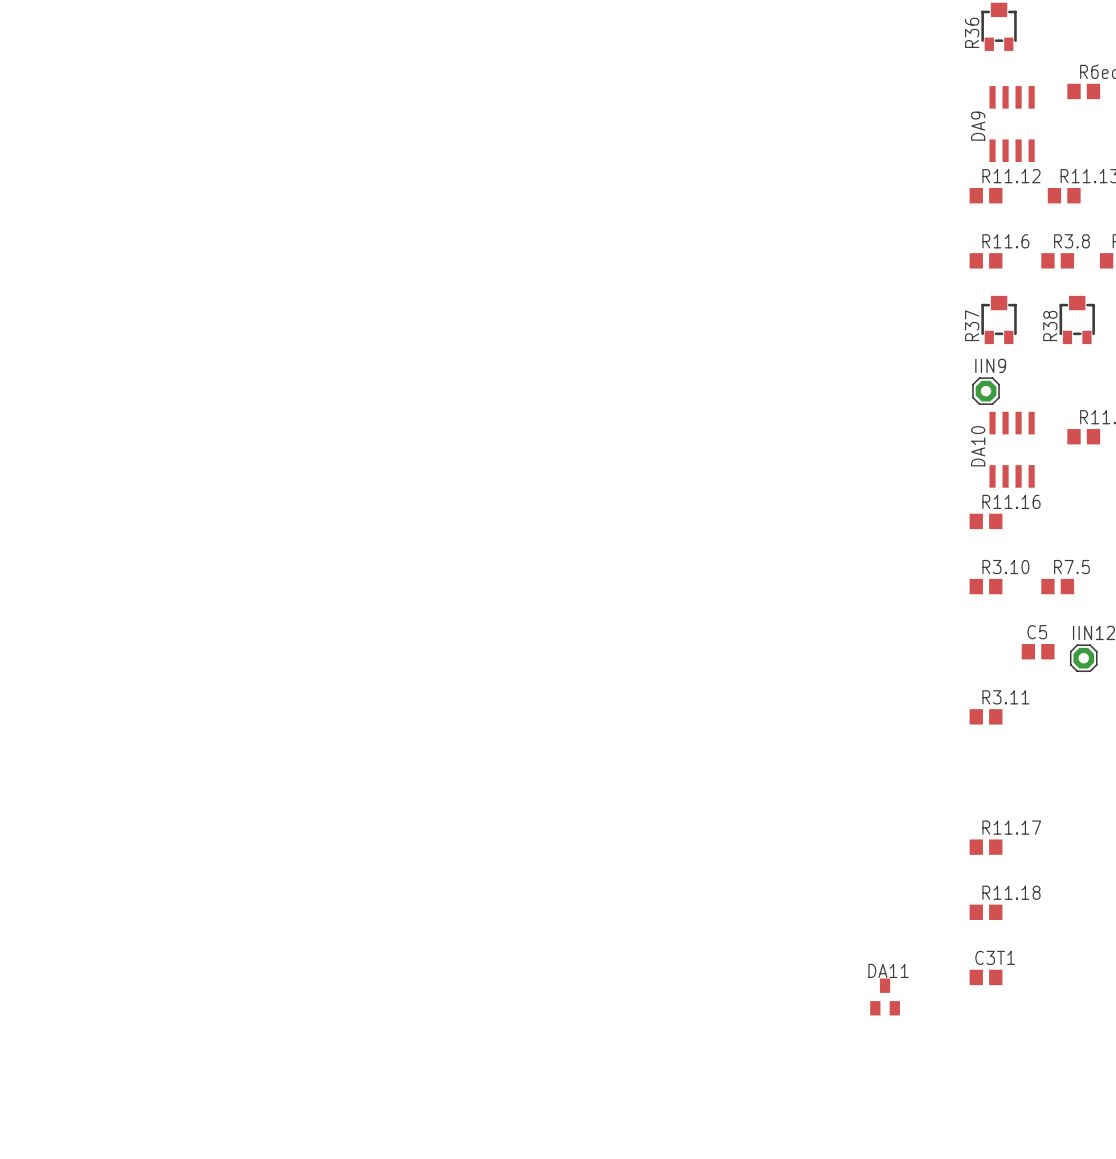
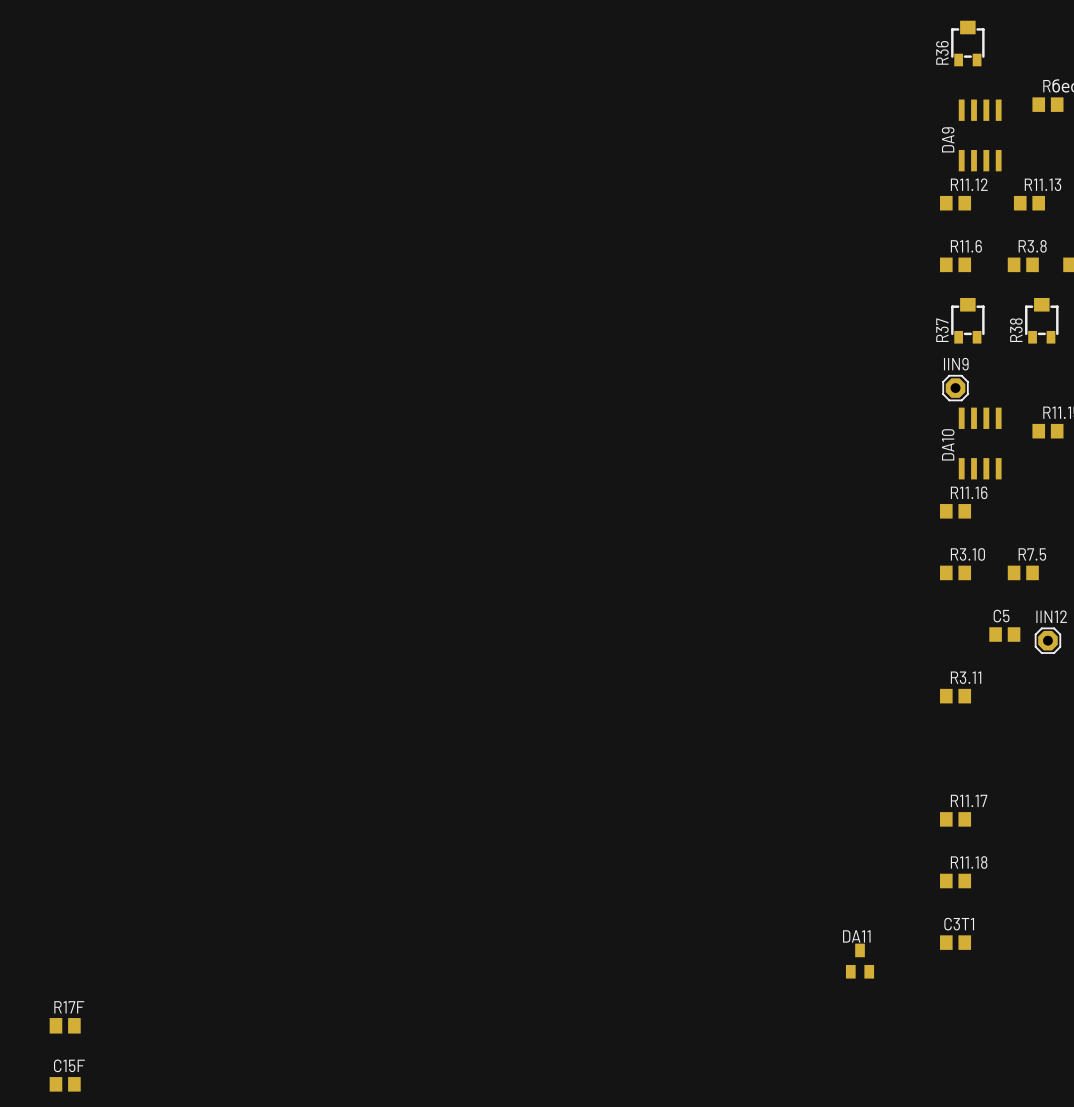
R17F: none -> (65, 1025)
C15F: none -> (65, 1084)

